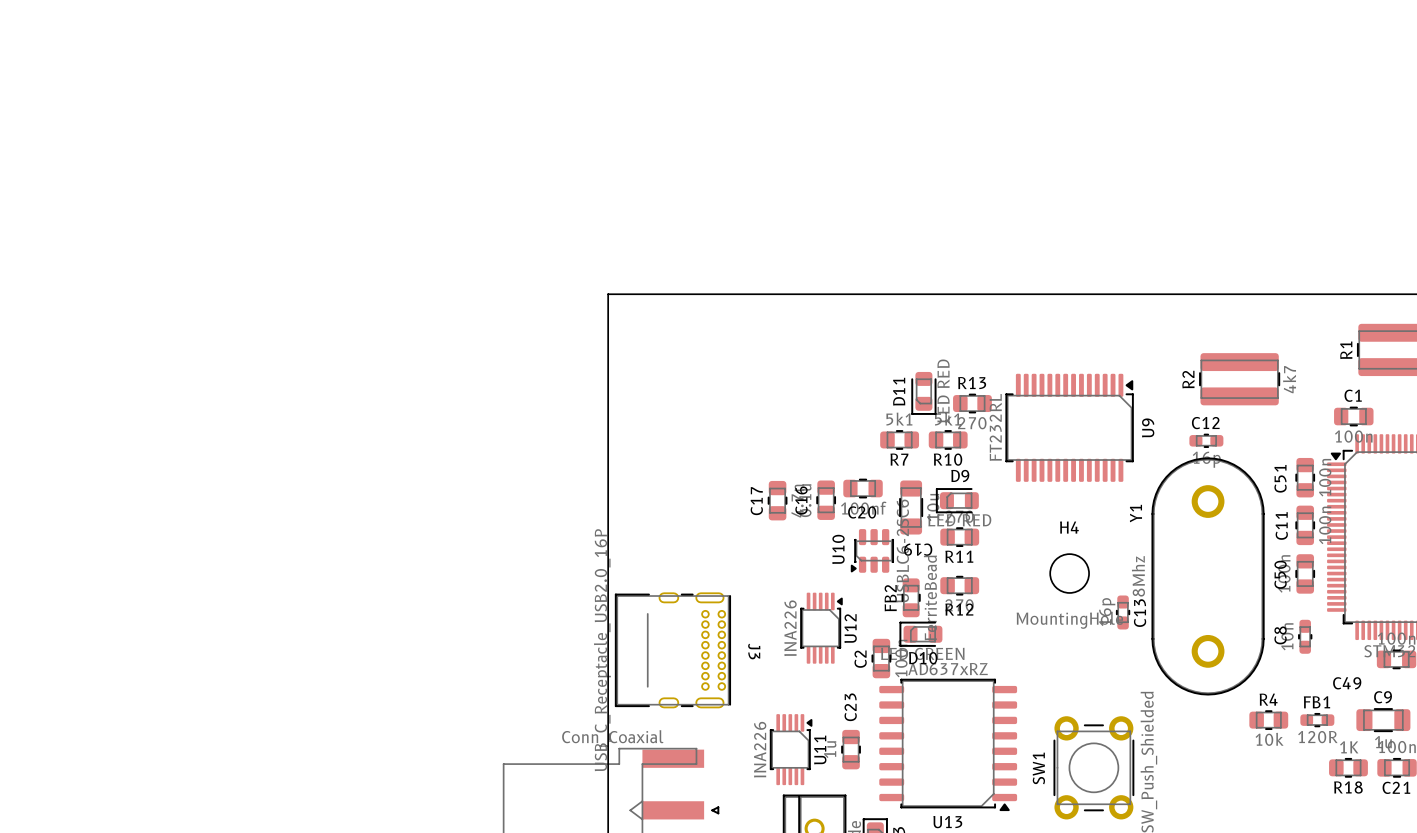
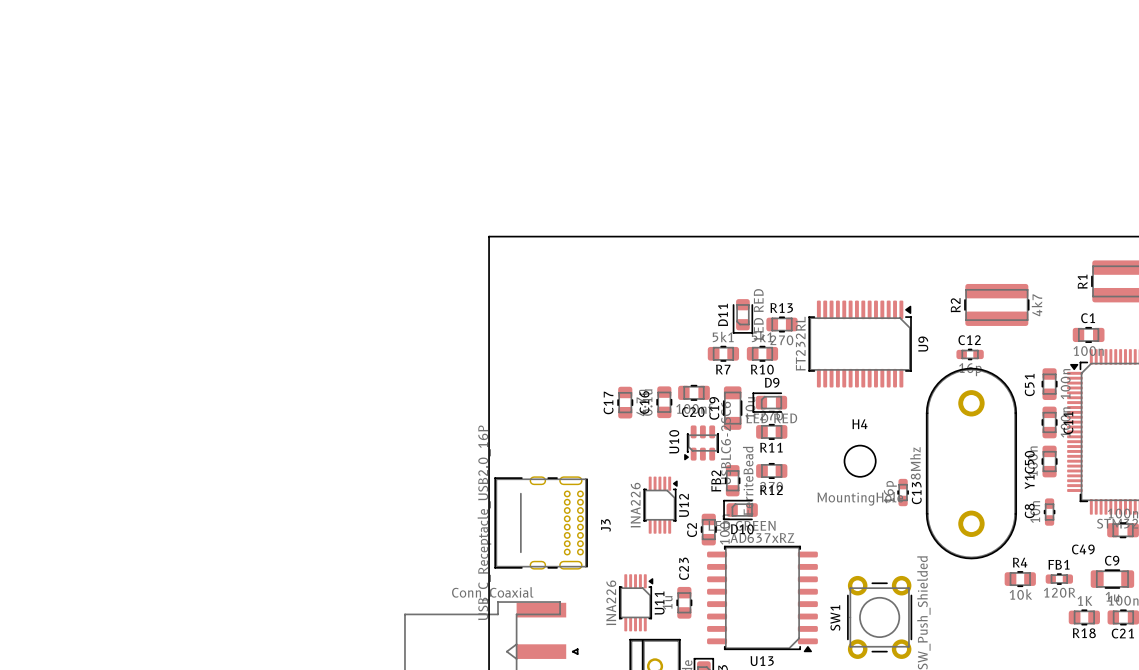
Y1 name position: Y1 (1135, 513) -> Y1 (1029, 482)
C11 name position: C11 (1281, 526) -> C11 (1068, 422)
C19 name rotation: 0° (918, 549) -> 90° clockwise (714, 408)
C19 name position: C19 (918, 549) -> C19 (714, 408)
J3 name rotation: 0° (754, 651) -> 180° (605, 525)

